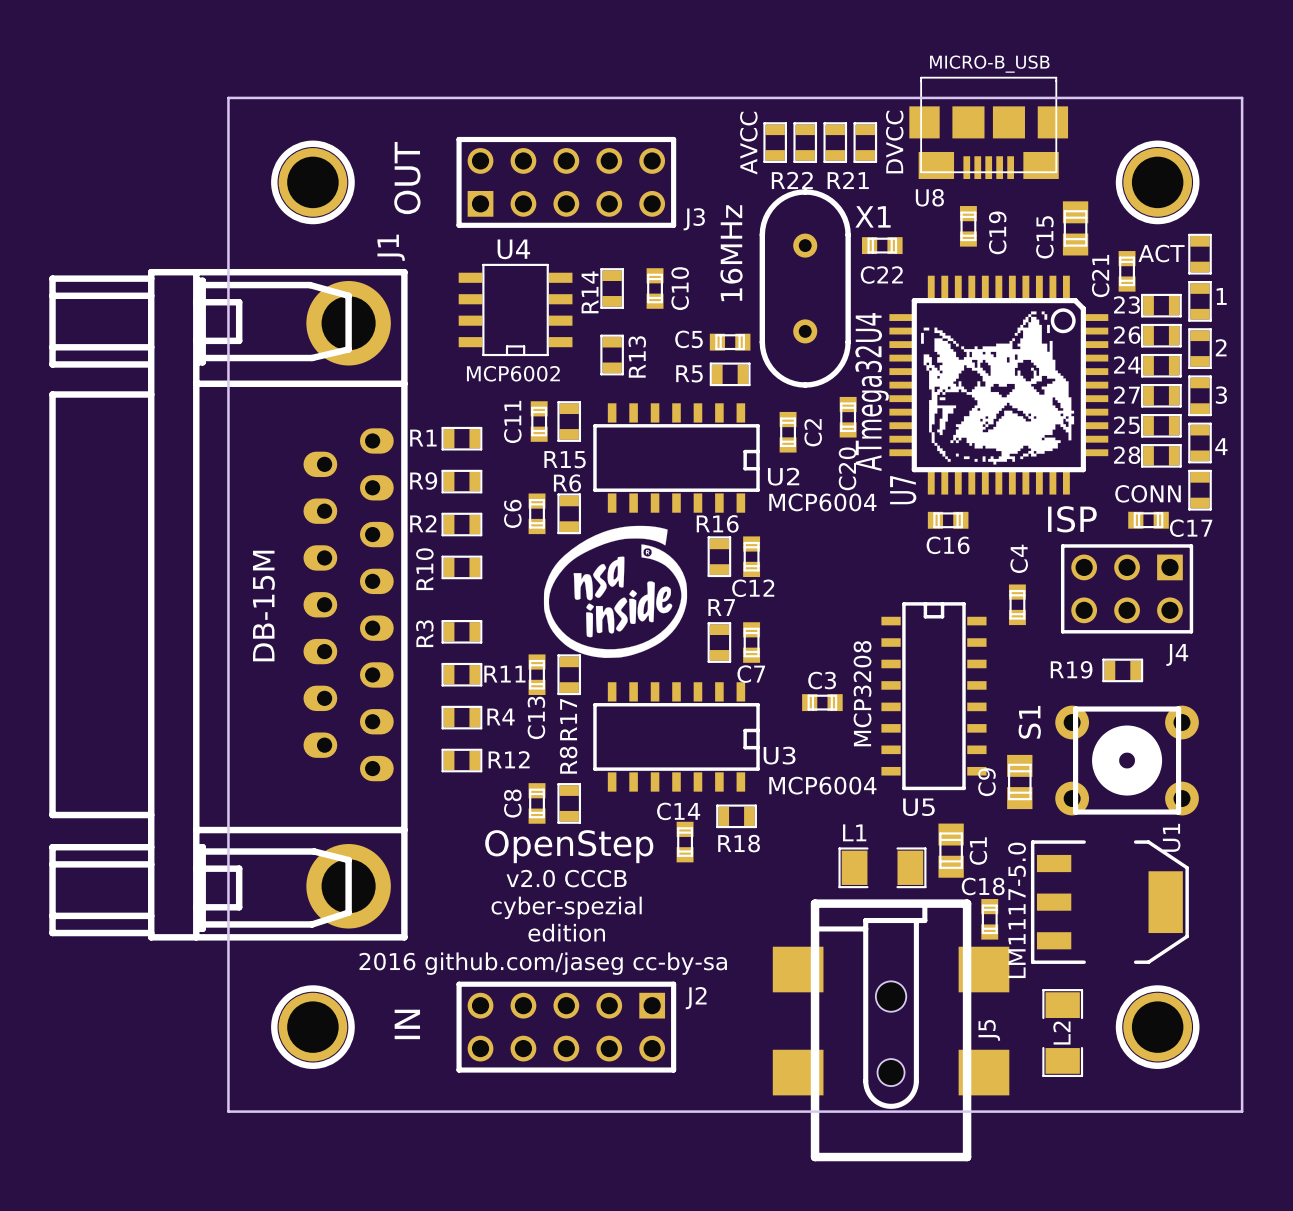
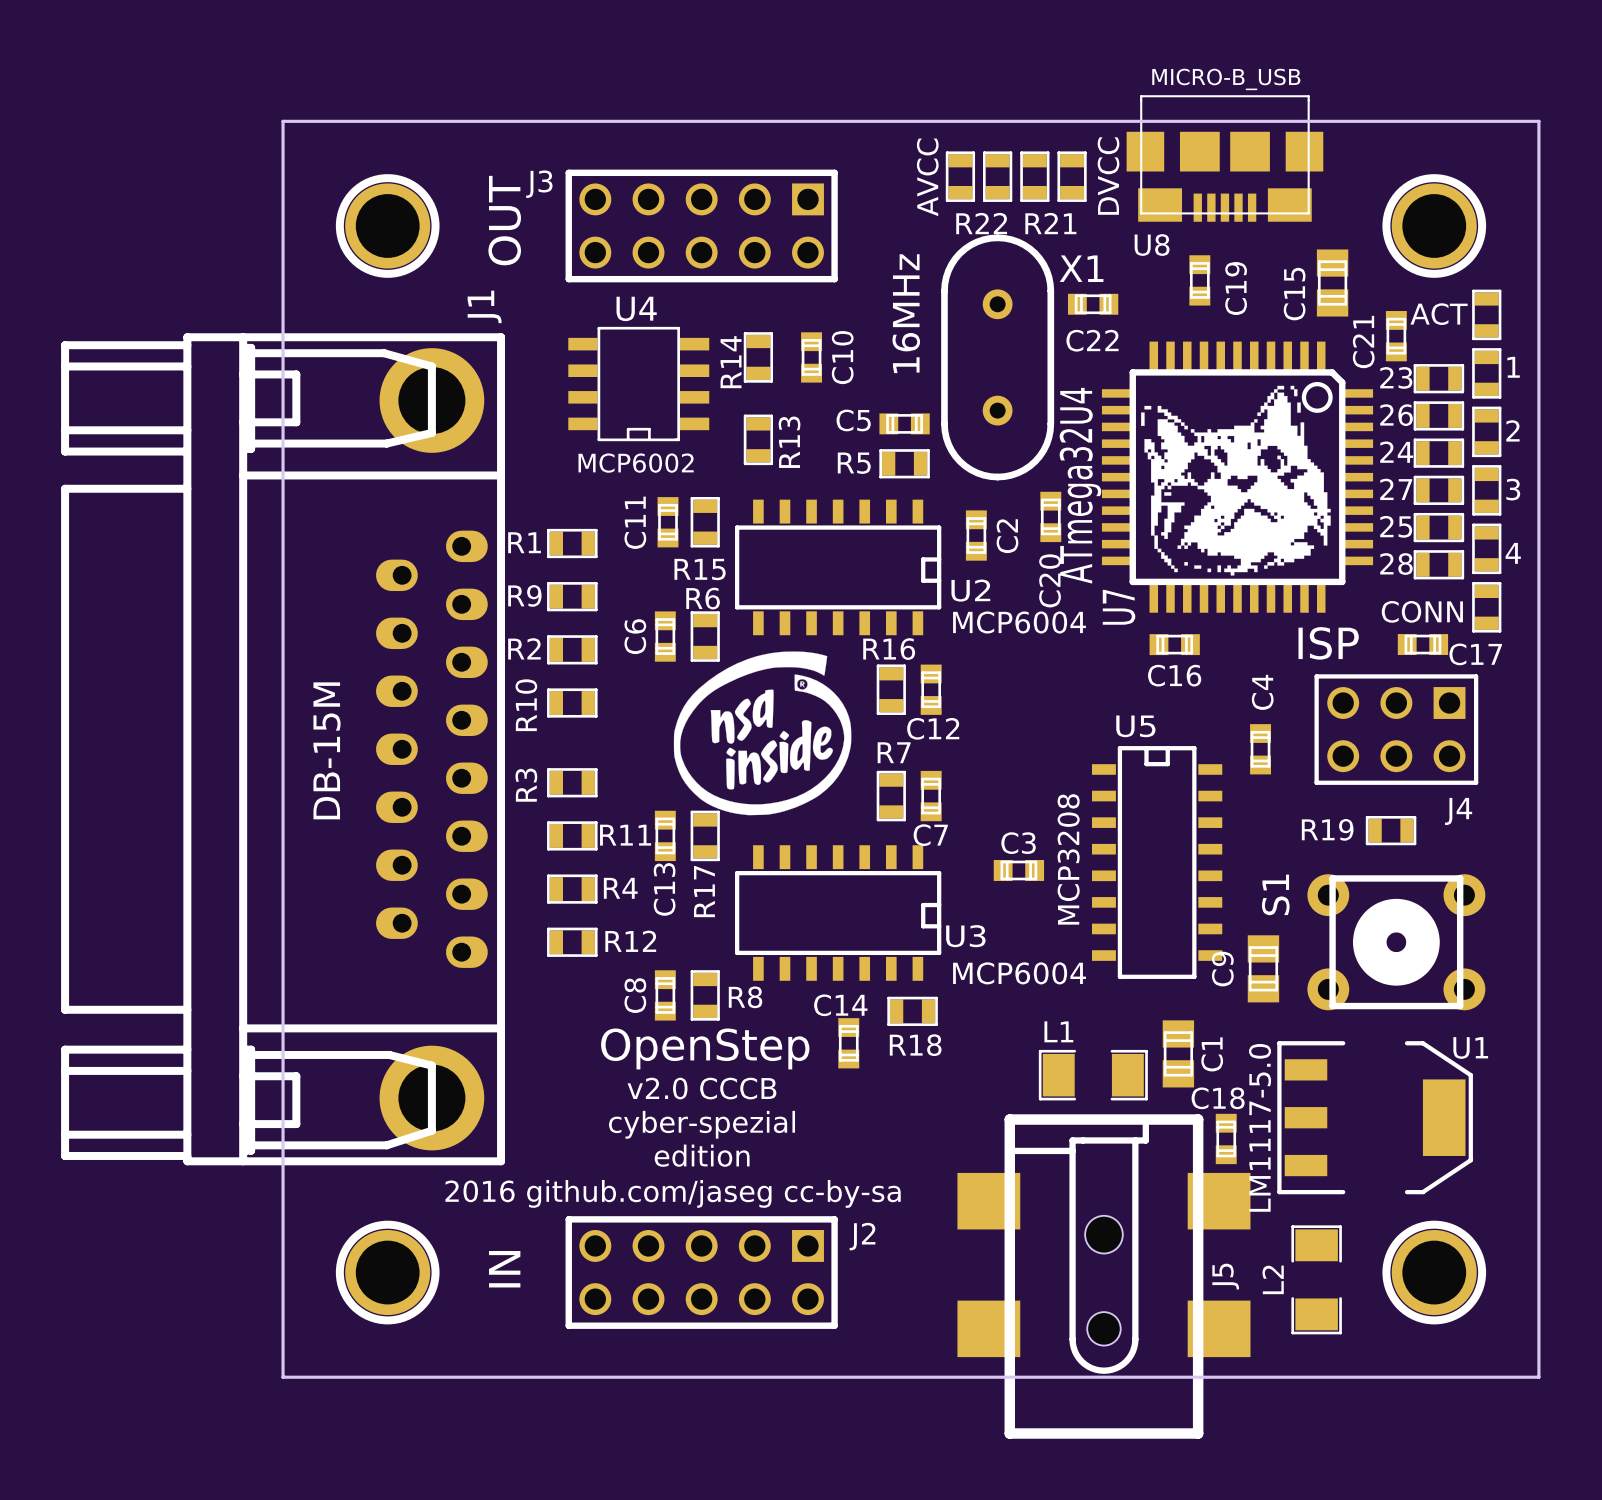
J3 rotation: 0° (566, 182) -> 180° (701, 225)
R8 name rotation: 0° (568, 760) -> 90° clockwise (745, 997)
R8 name position: R8 (568, 760) -> R8 (745, 997)
U5 name position: U5 (918, 807) -> U5 (1135, 726)
U1 name rotation: 0° (1171, 837) -> 90° clockwise (1470, 1048)
L2 name position: L2 (1061, 1033) -> L2 (1273, 1279)

